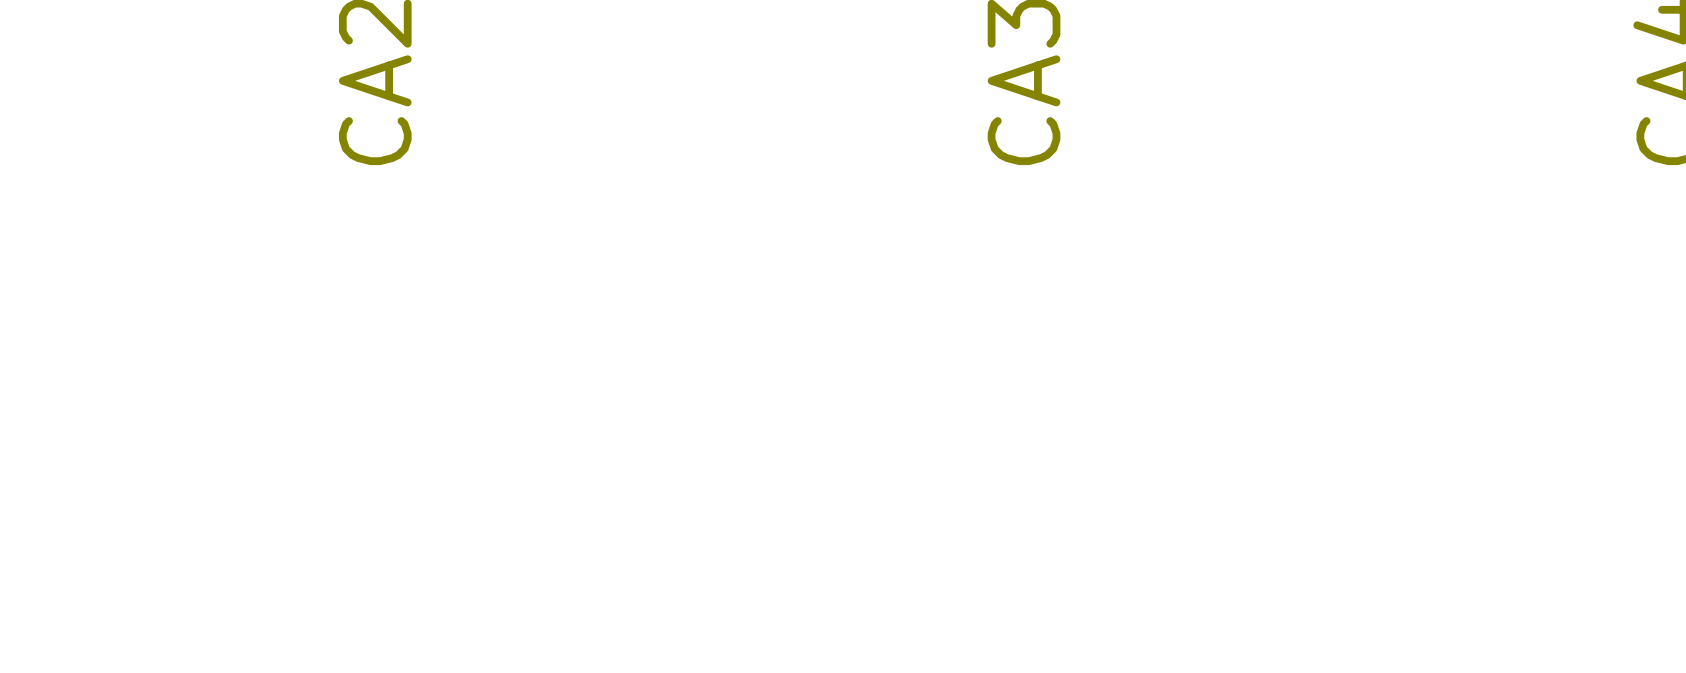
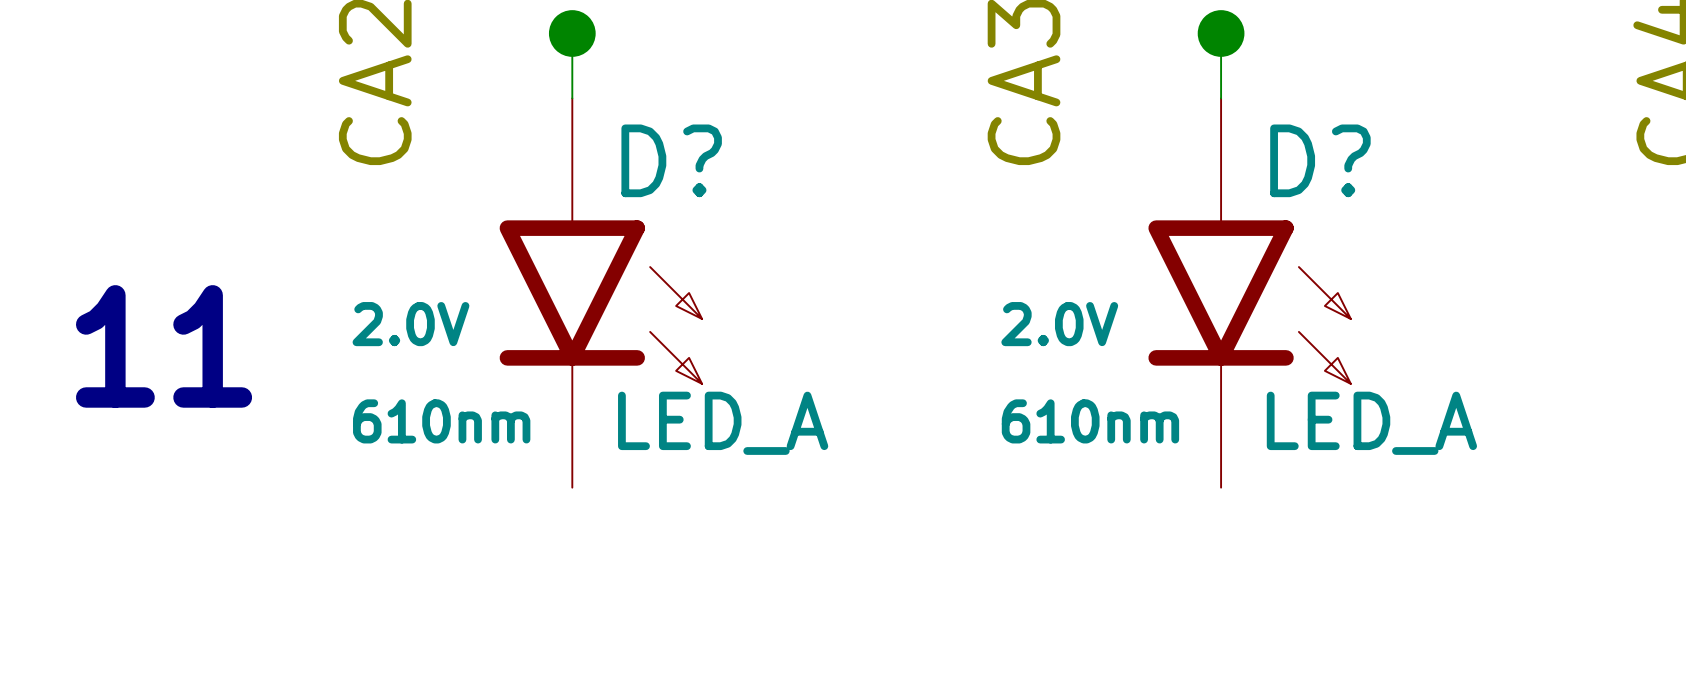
wire: none -> (572, 33) (572, 98)
junction: none -> (572, 33)
wire: none -> (1221, 33) (1221, 98)
junction: none -> (1221, 33)
D?: none -> LED_A (600, 293)
D?: none -> LED_A (1249, 293)
text: none -> 11 (164, 346)

